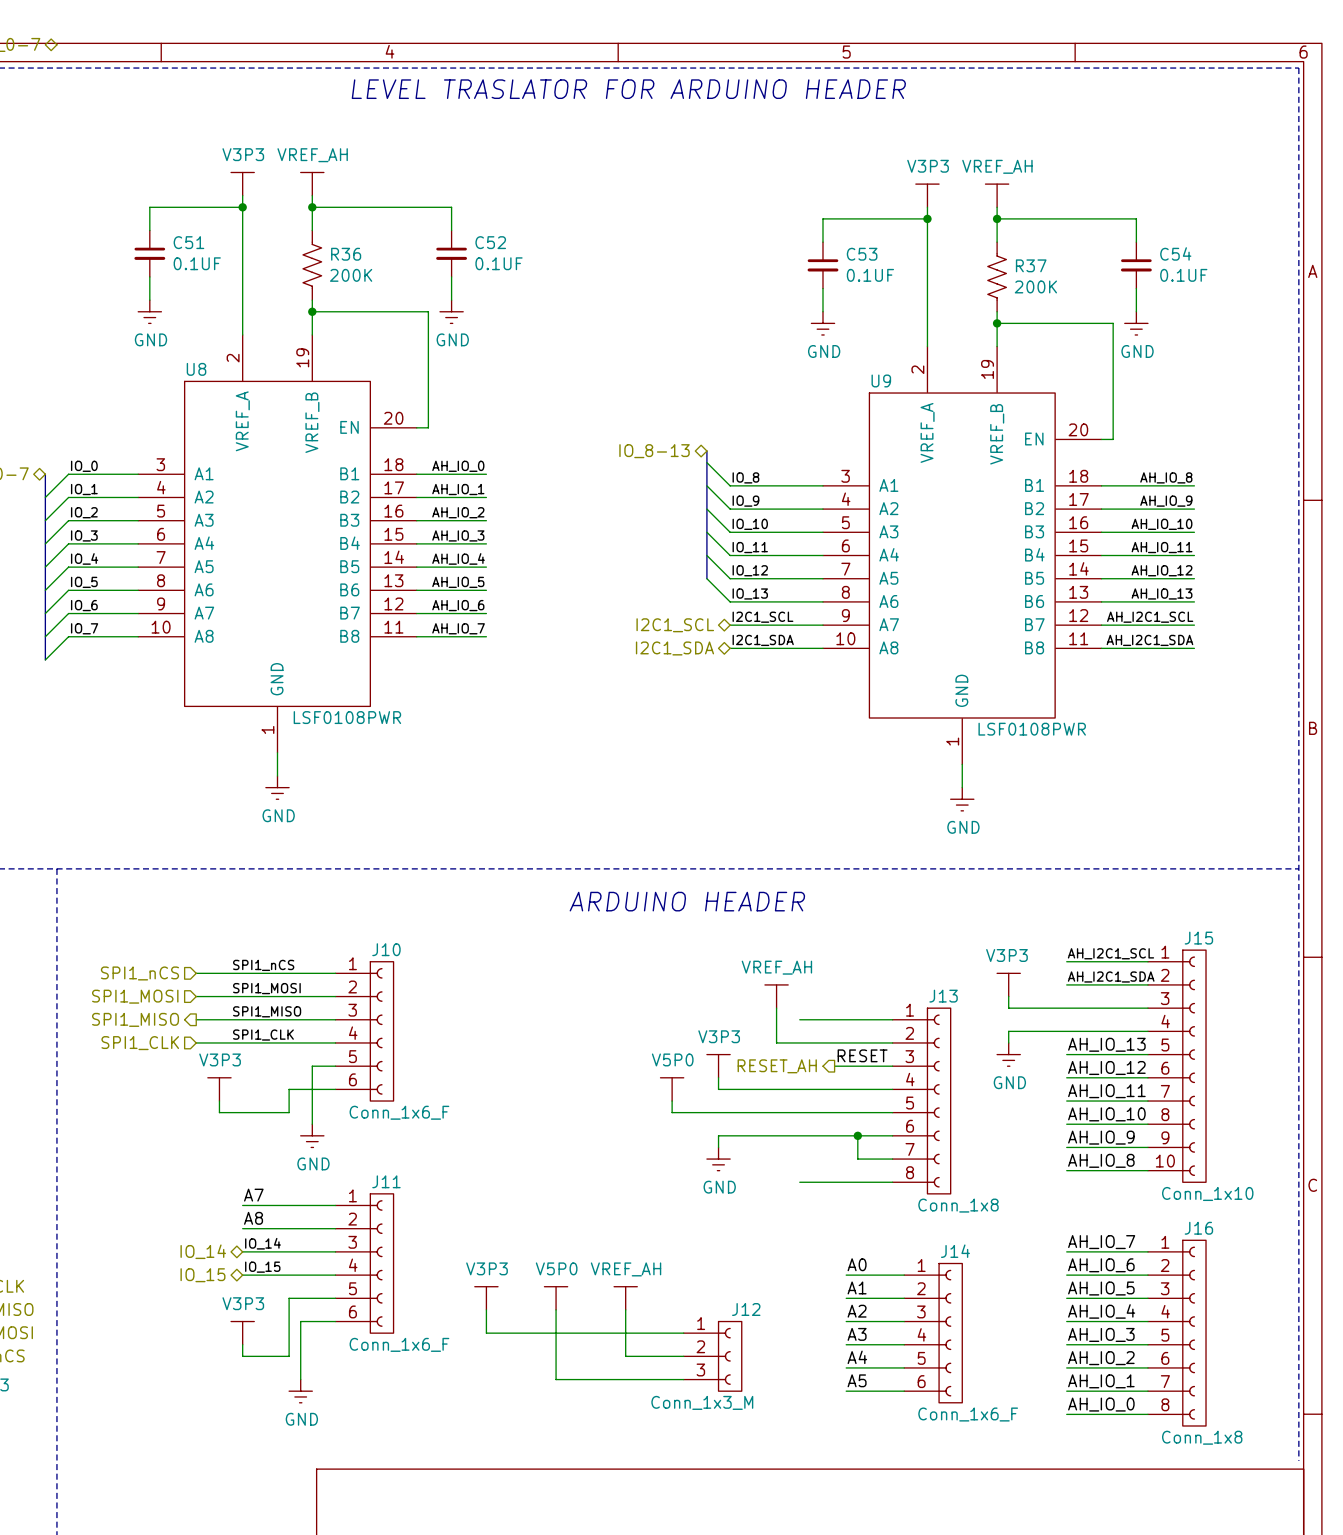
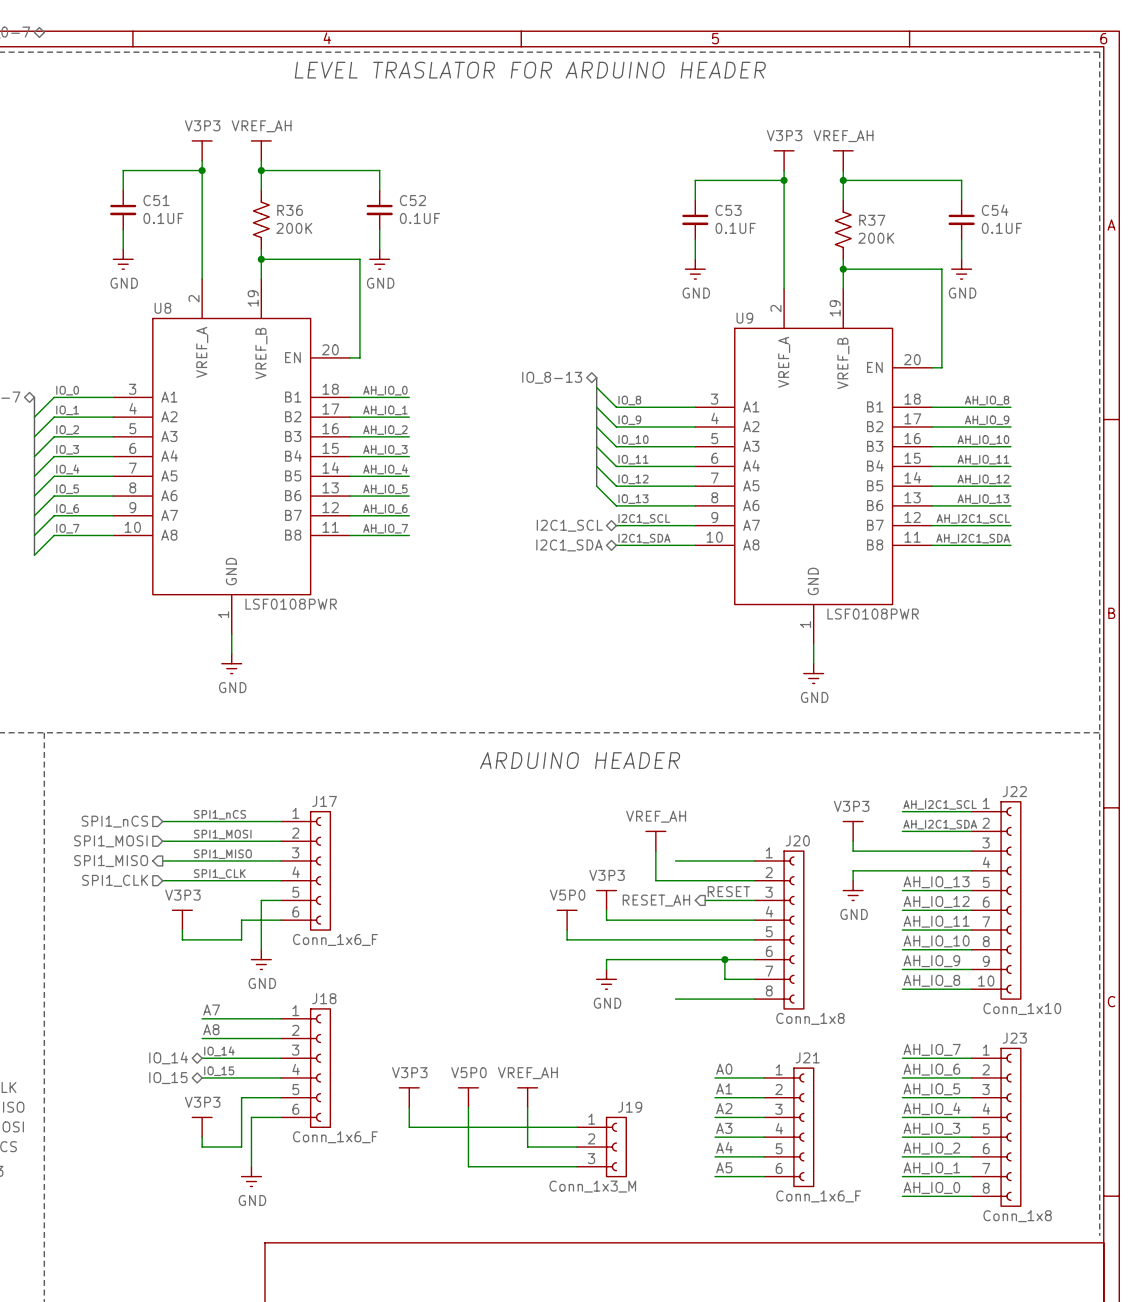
J15 name: J15 (1198, 938) -> J22 (1014, 791)
J10 name: J10 (386, 949) -> J17 (324, 801)
J13 name: J13 (943, 996) -> J20 (797, 840)
J11 name: J11 (386, 1181) -> J18 (324, 998)
J16 name: J16 (1198, 1228) -> J23 (1014, 1038)
J14 name: J14 (955, 1251) -> J21 (807, 1057)
J12 name: J12 (746, 1309) -> J19 (630, 1107)

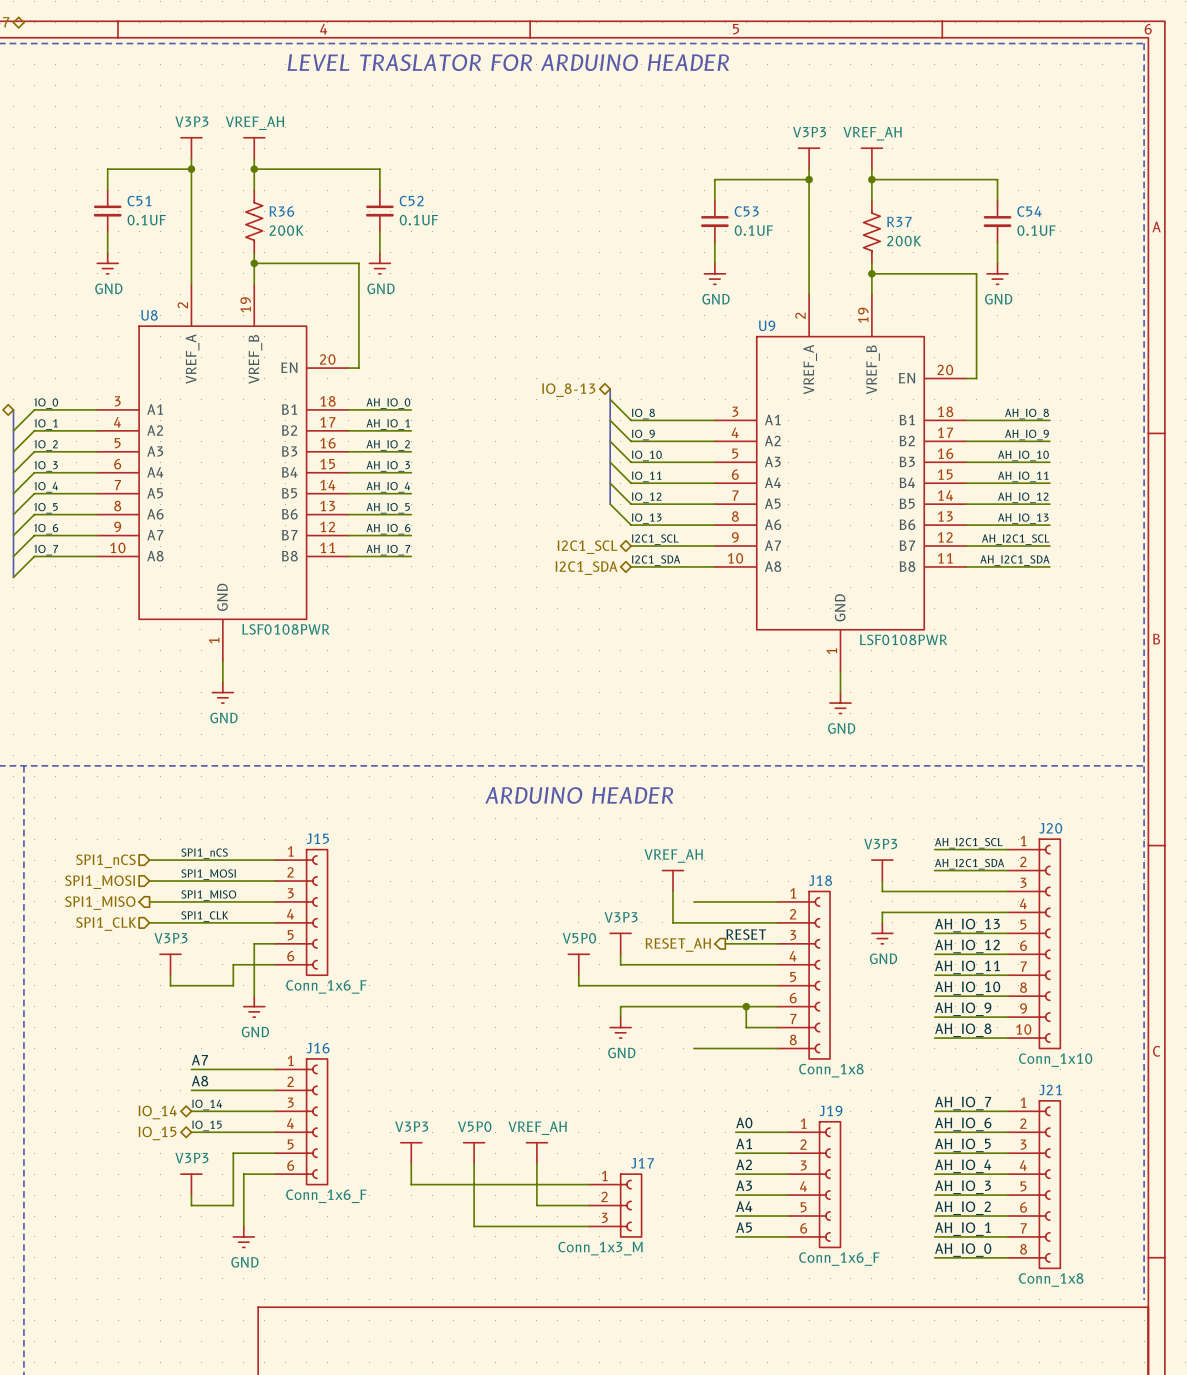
J22 name: J22 (1014, 791) -> J20 (1050, 828)
J17 name: J17 (324, 801) -> J15 (317, 838)
J20 name: J20 (797, 840) -> J18 (820, 880)
J18 name: J18 (324, 998) -> J16 (318, 1048)
J23 name: J23 (1014, 1038) -> J21 (1050, 1090)
J21 name: J21 (807, 1057) -> J19 (830, 1110)
J19 name: J19 (630, 1107) -> J17 (642, 1163)

